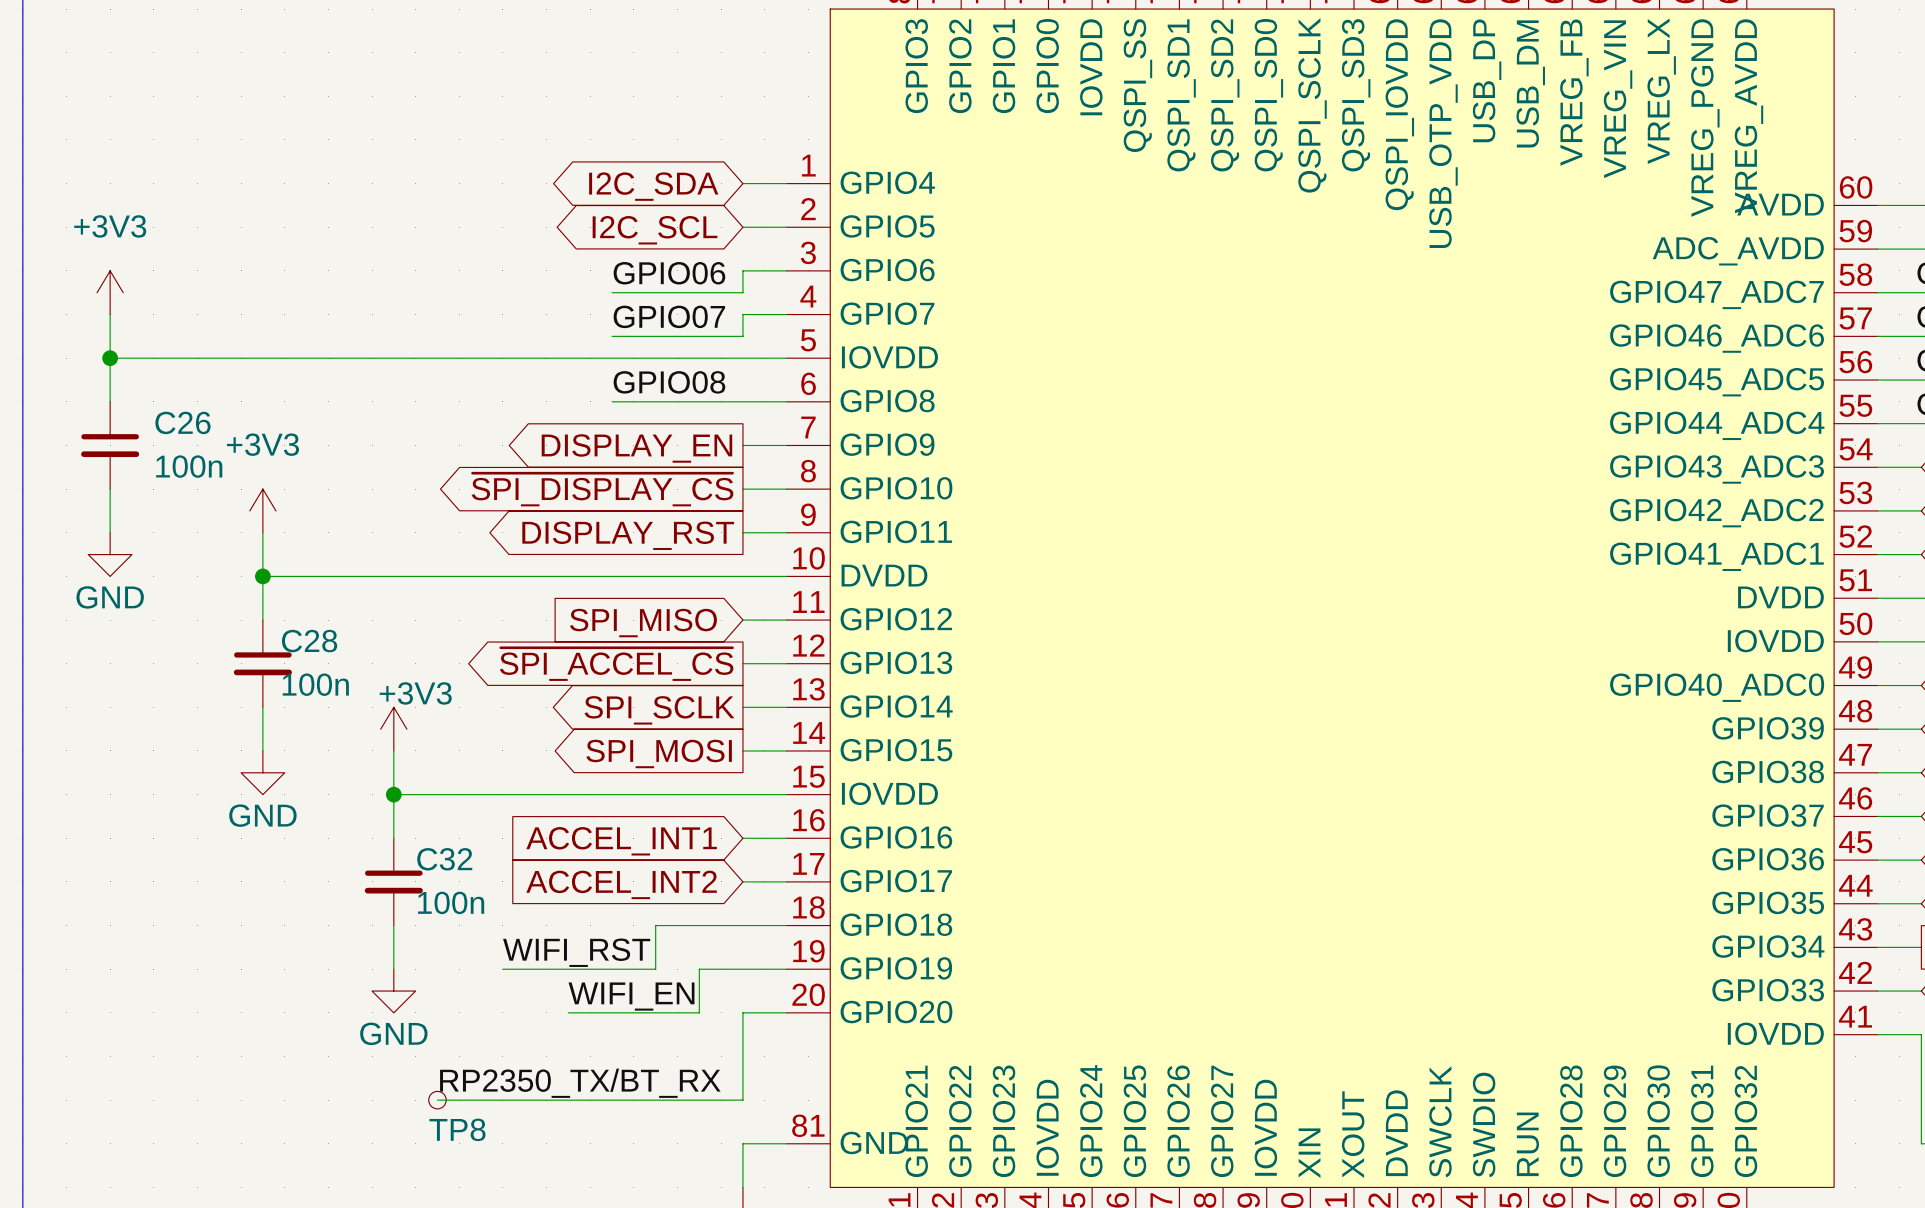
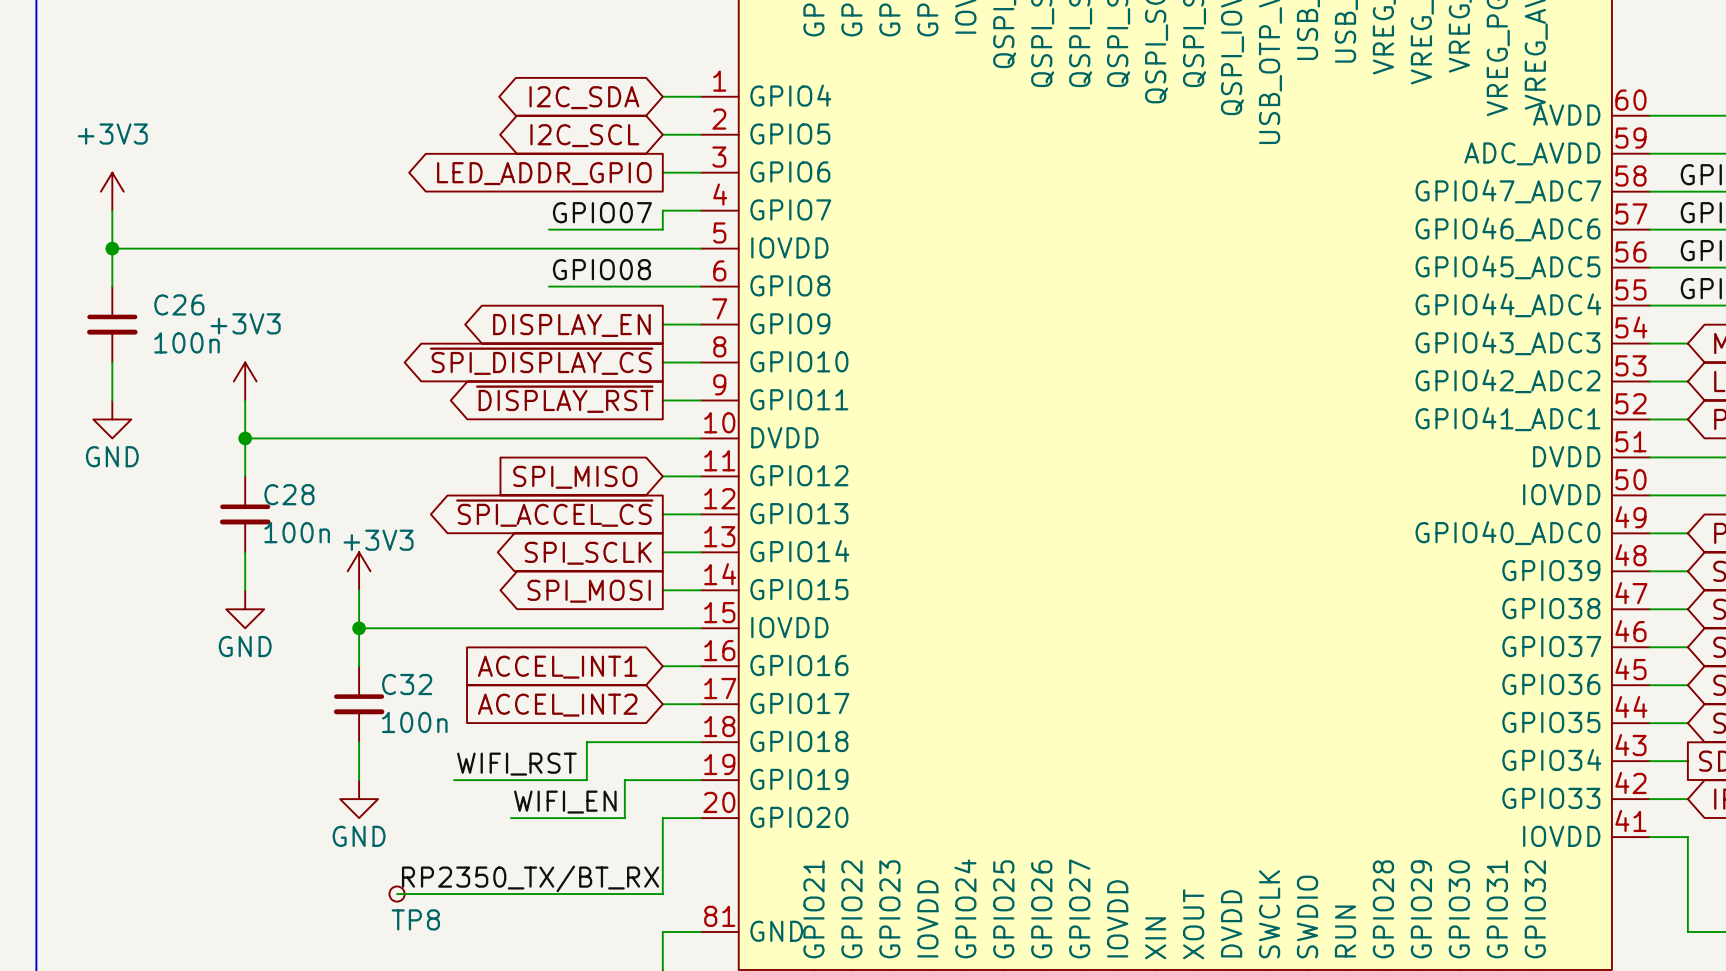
global label: none -> LED_ADDR_GPIO (544, 173)
label: GPIO06 (669, 273) -> none
global label: DISPLAY_RST (628, 535) -> ~{DISPLAY_RST} (564, 399)

